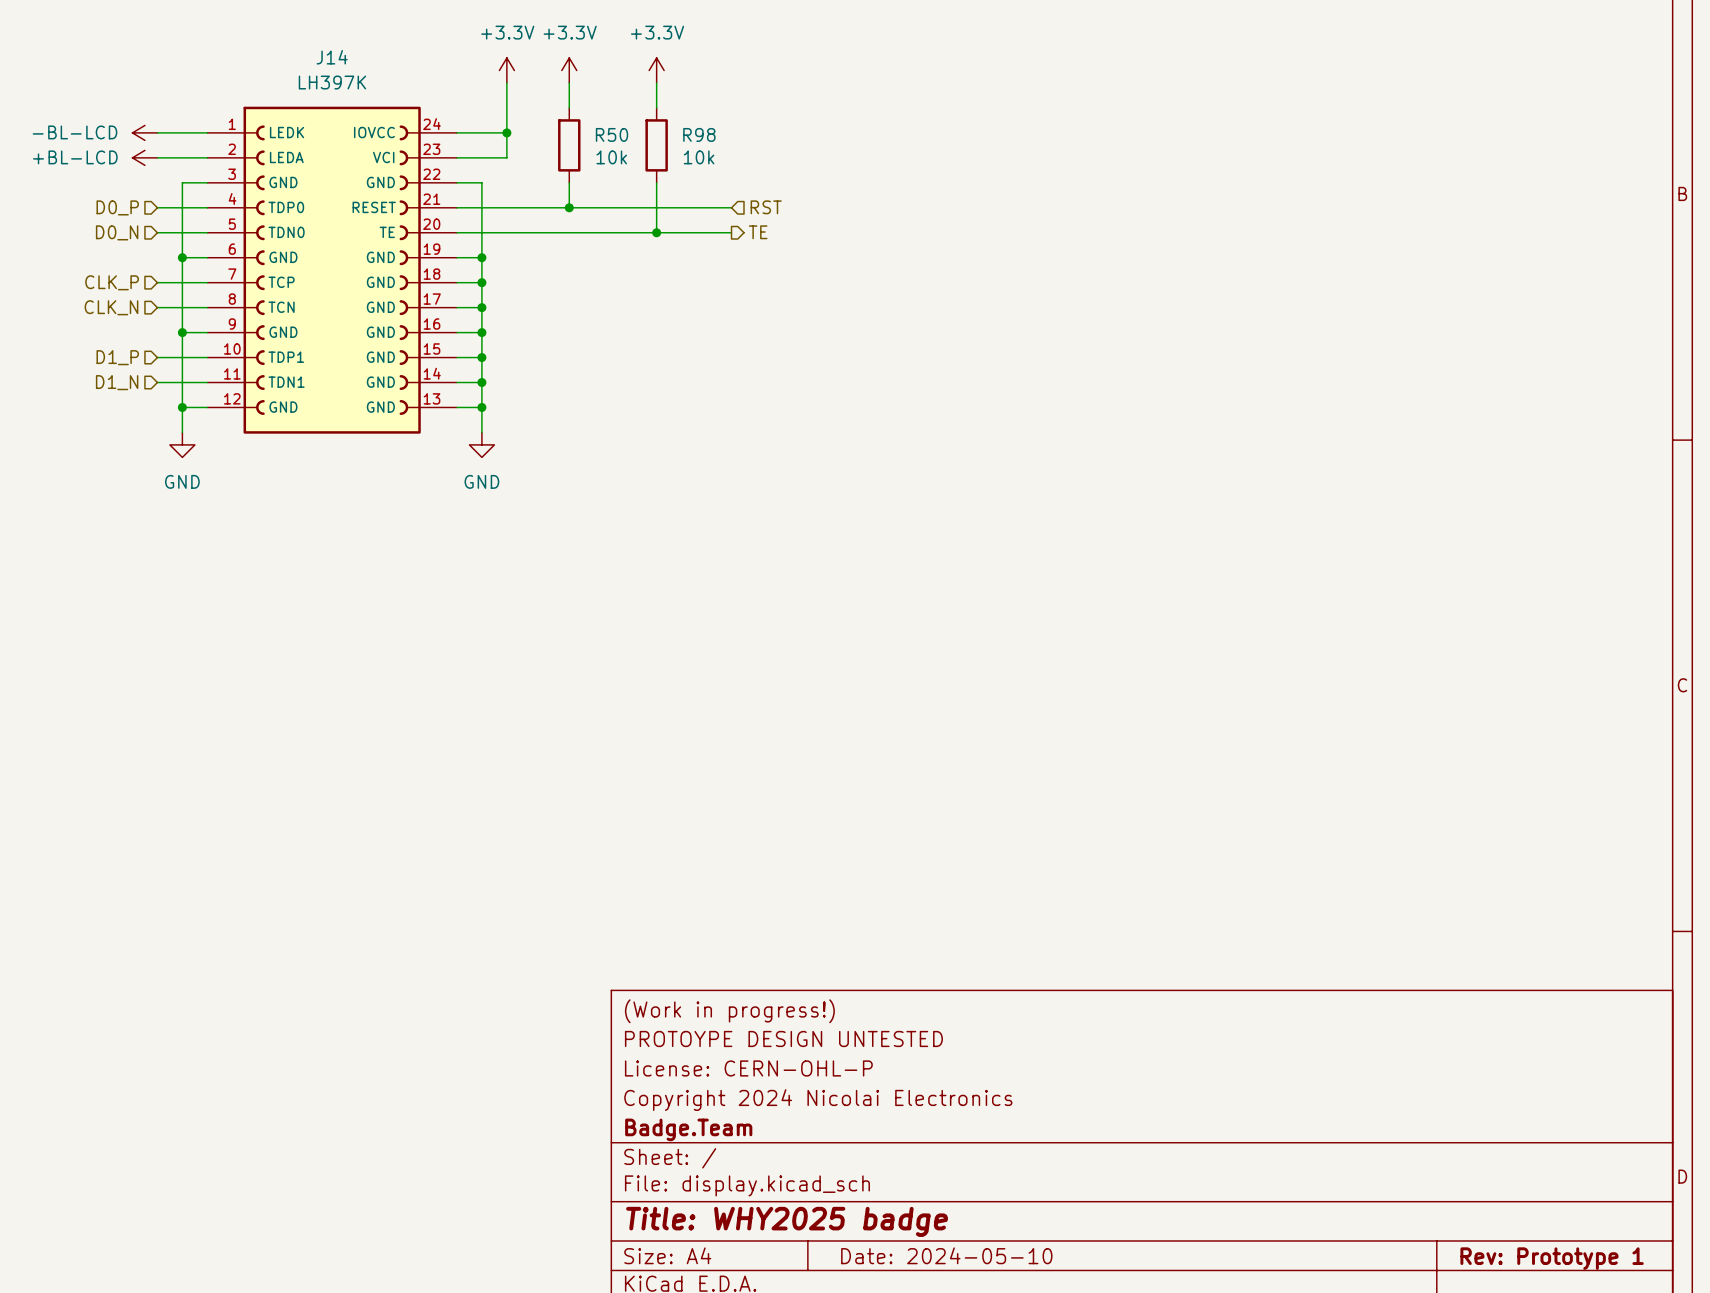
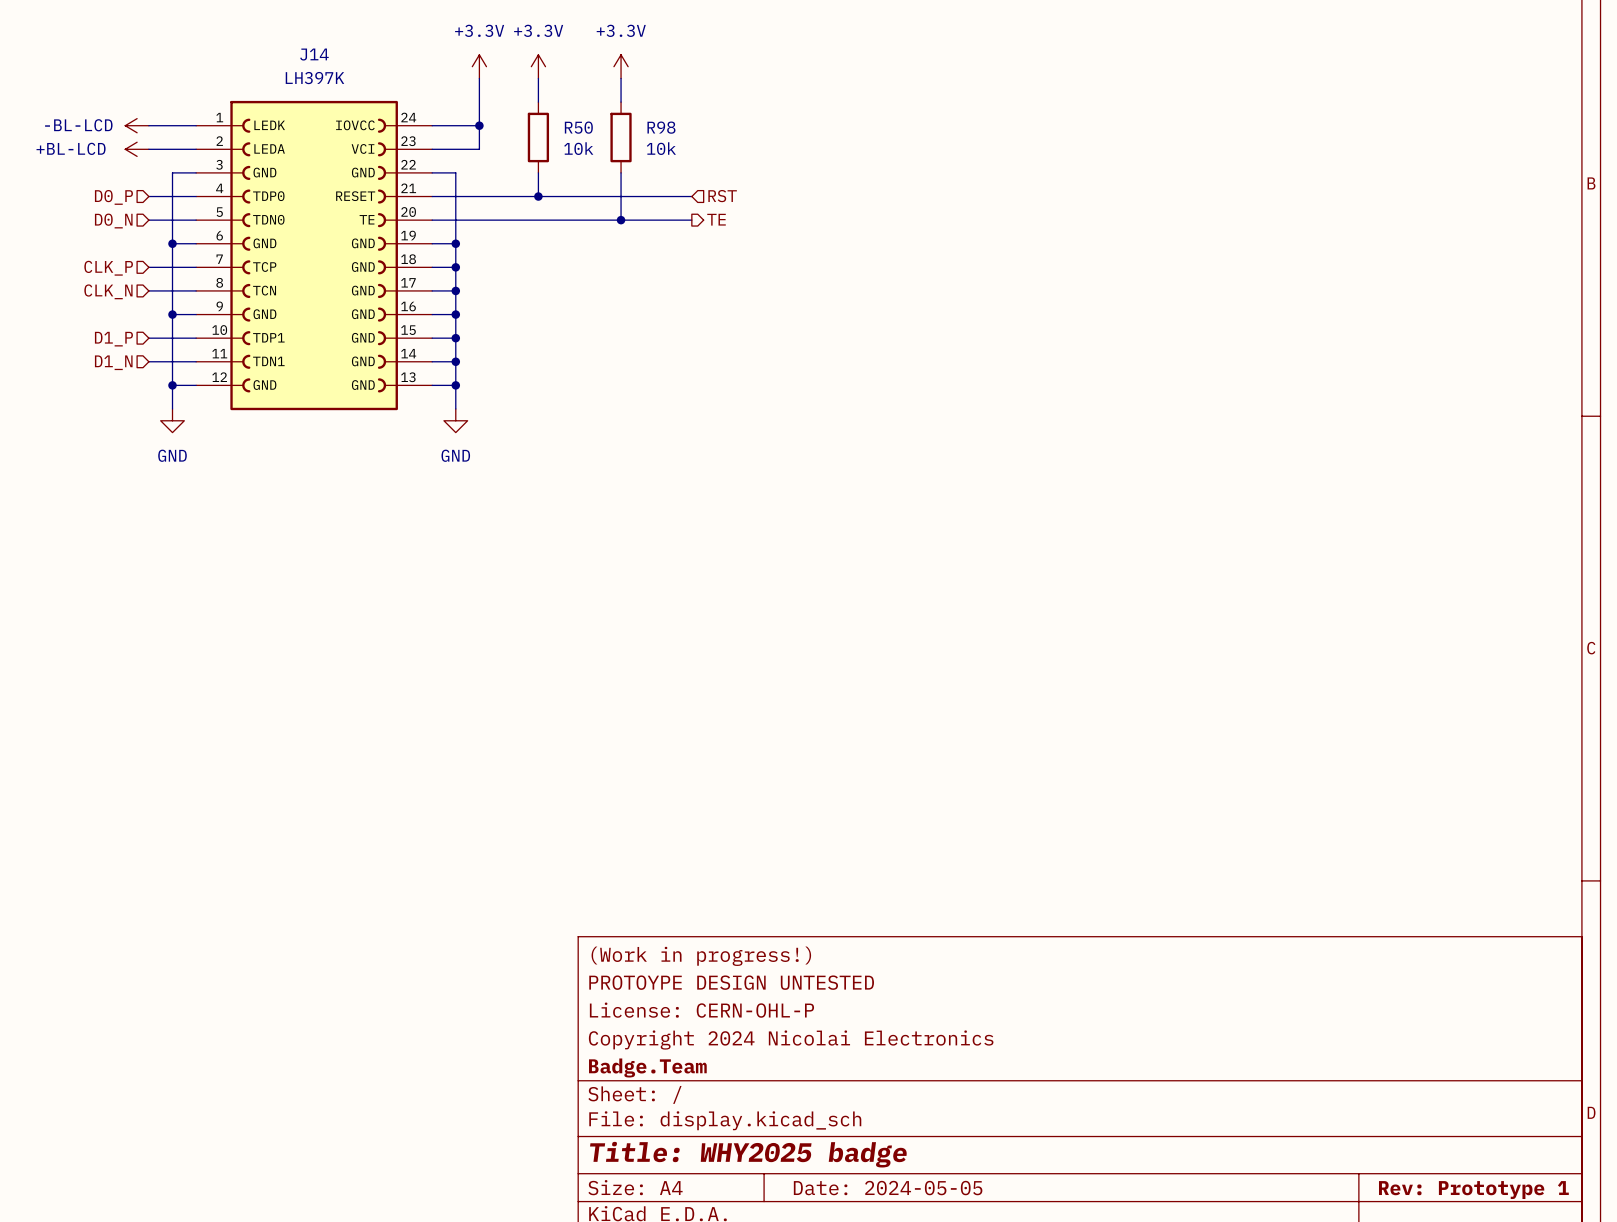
title block: Date: 2024-05-10 (946, 1255) -> Date: 2024-05-05 (888, 1188)

